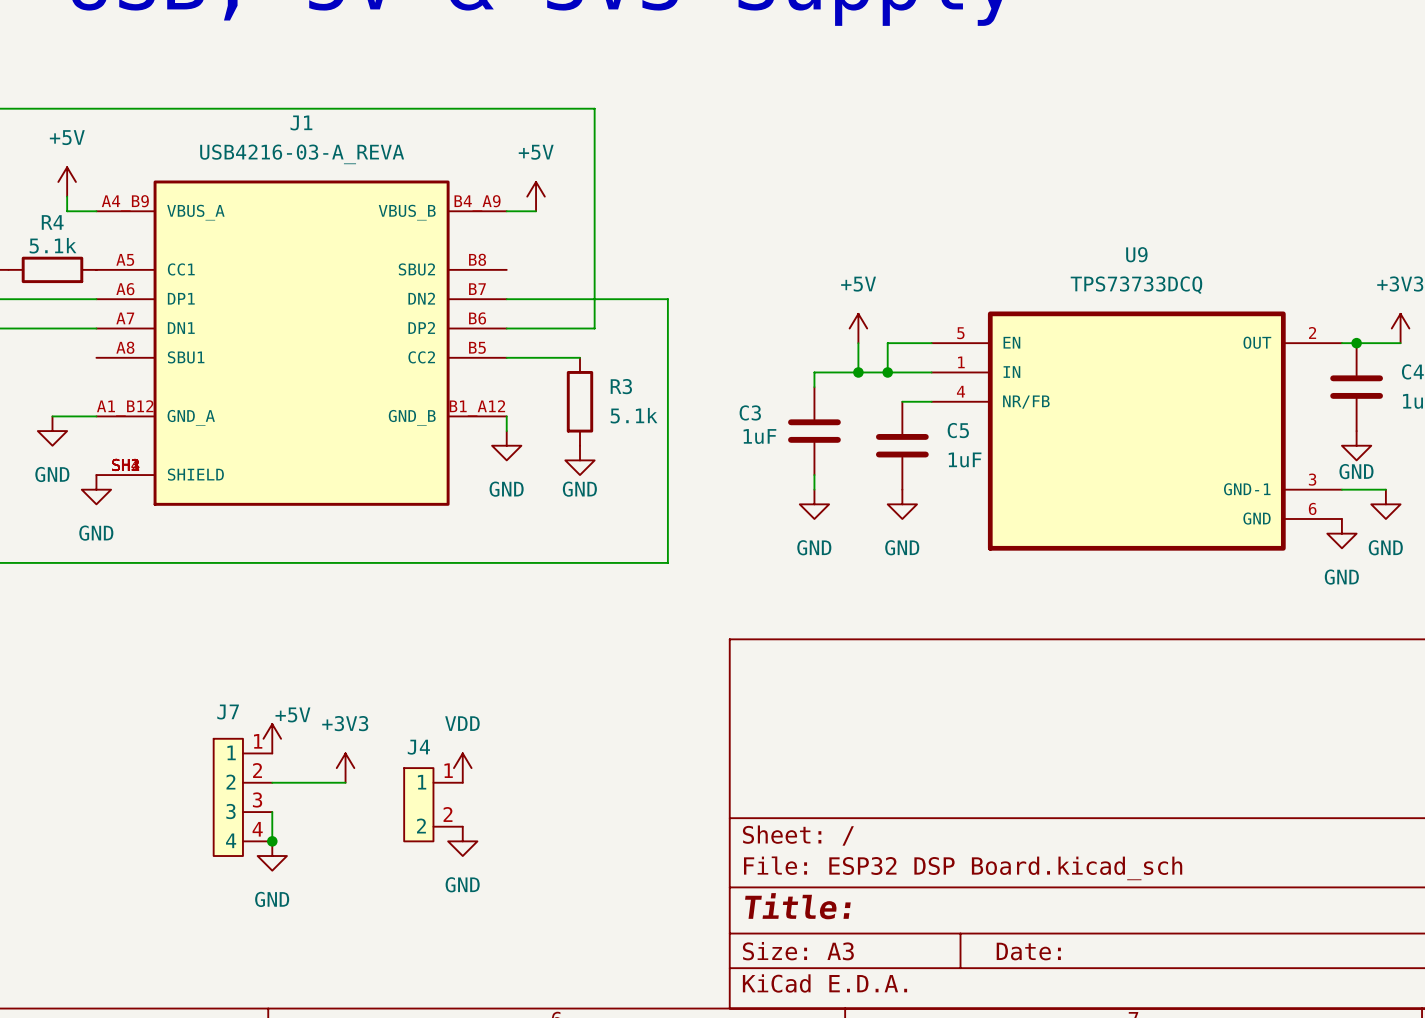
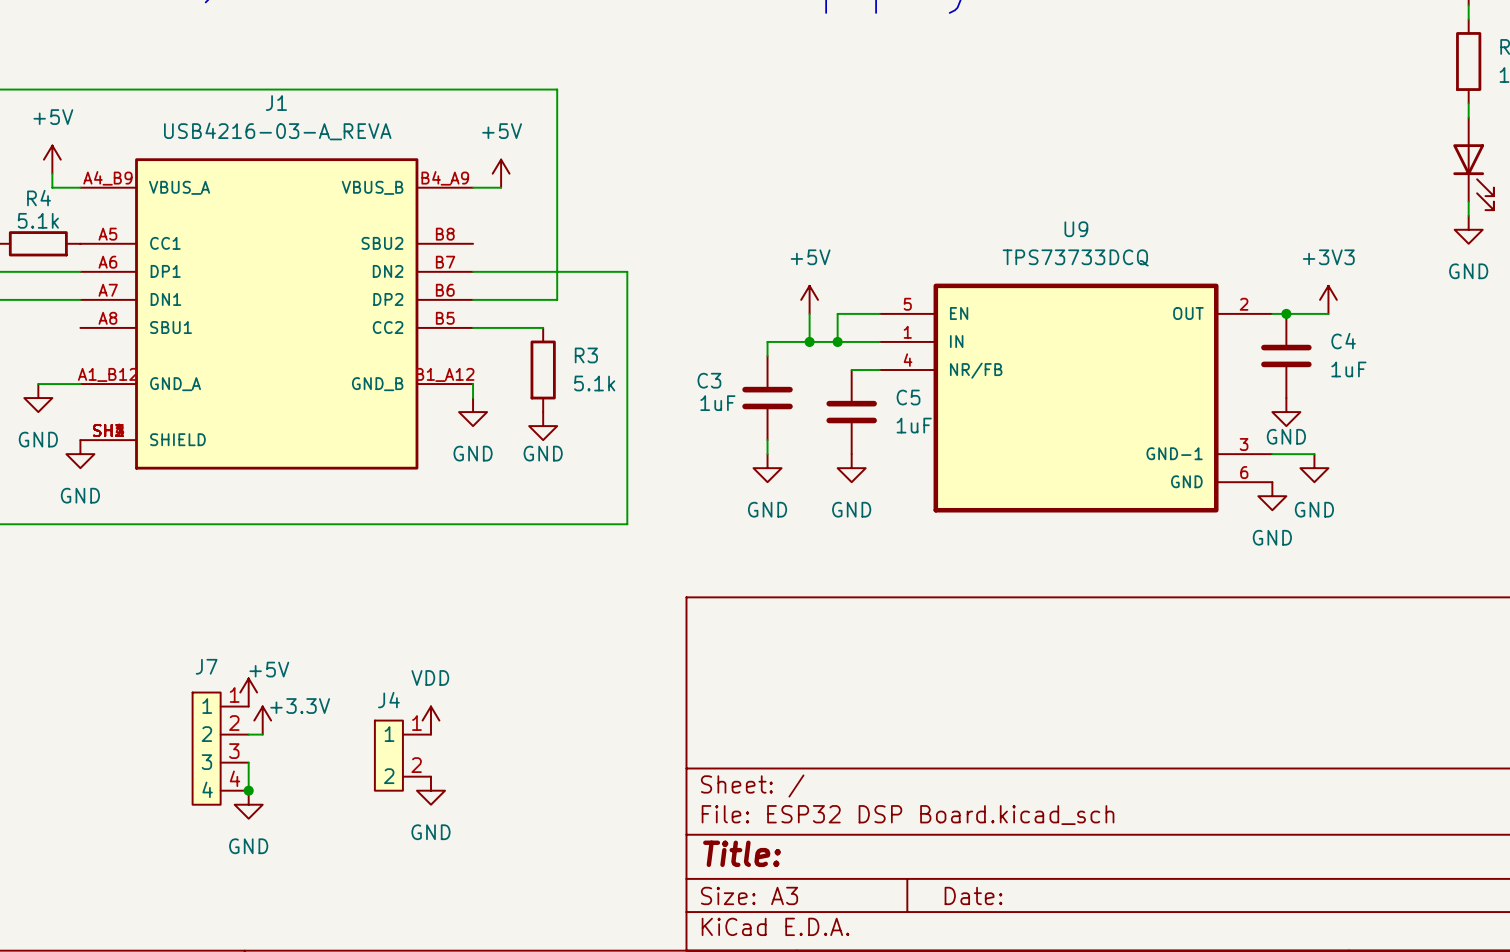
power symbol: none -> +3.3V (262, 720)
power symbol: +3V3 (345, 768) -> none
wire: (286, 782) (345, 782) -> none

